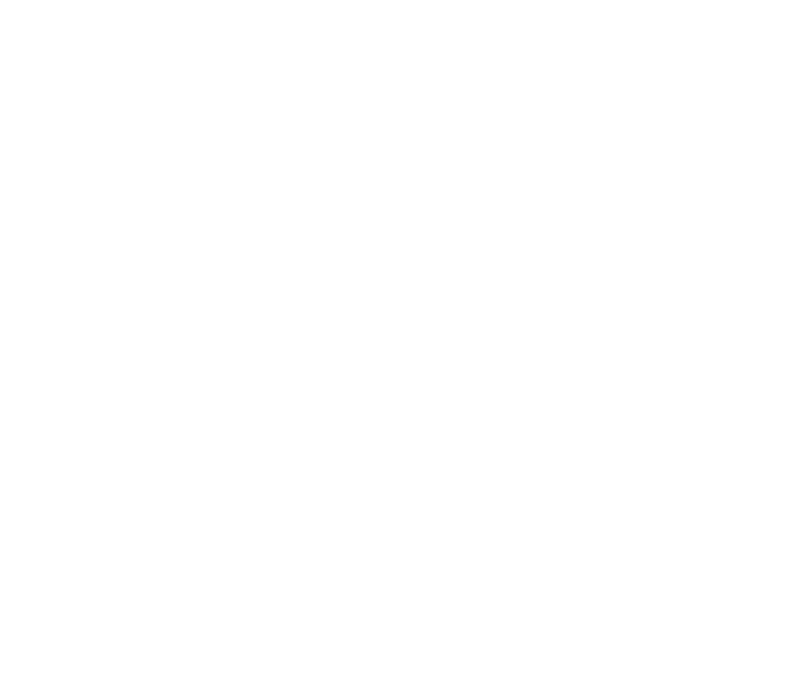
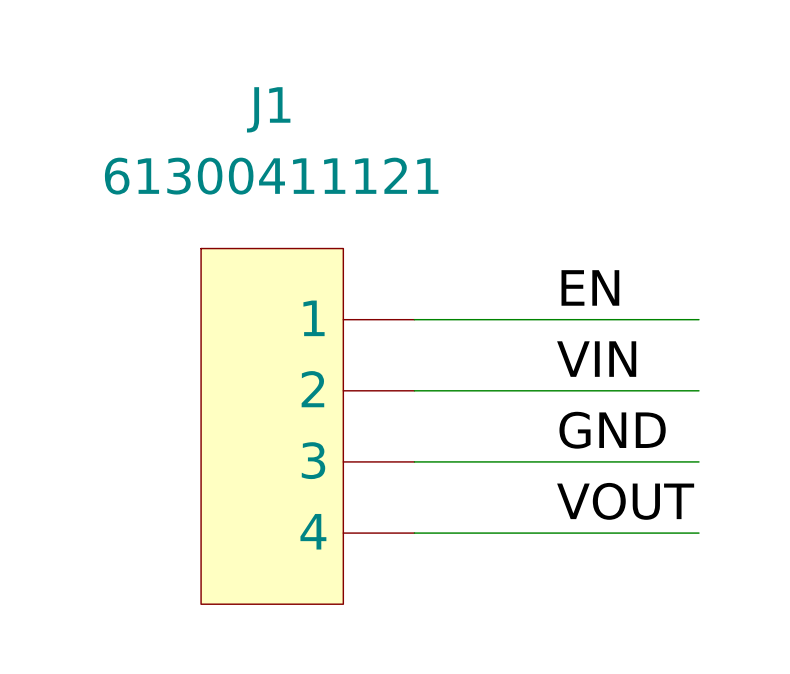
label: none -> EN (590, 287)
wire: none -> (414, 319) (698, 319)
label: none -> VIN (596, 359)
wire: none -> (414, 390) (698, 390)
J1: none -> 61300411121 (307, 426)
label: none -> GND (612, 430)
wire: none -> (414, 461) (698, 461)
label: none -> VOUT (625, 501)
wire: none -> (414, 533) (698, 533)

